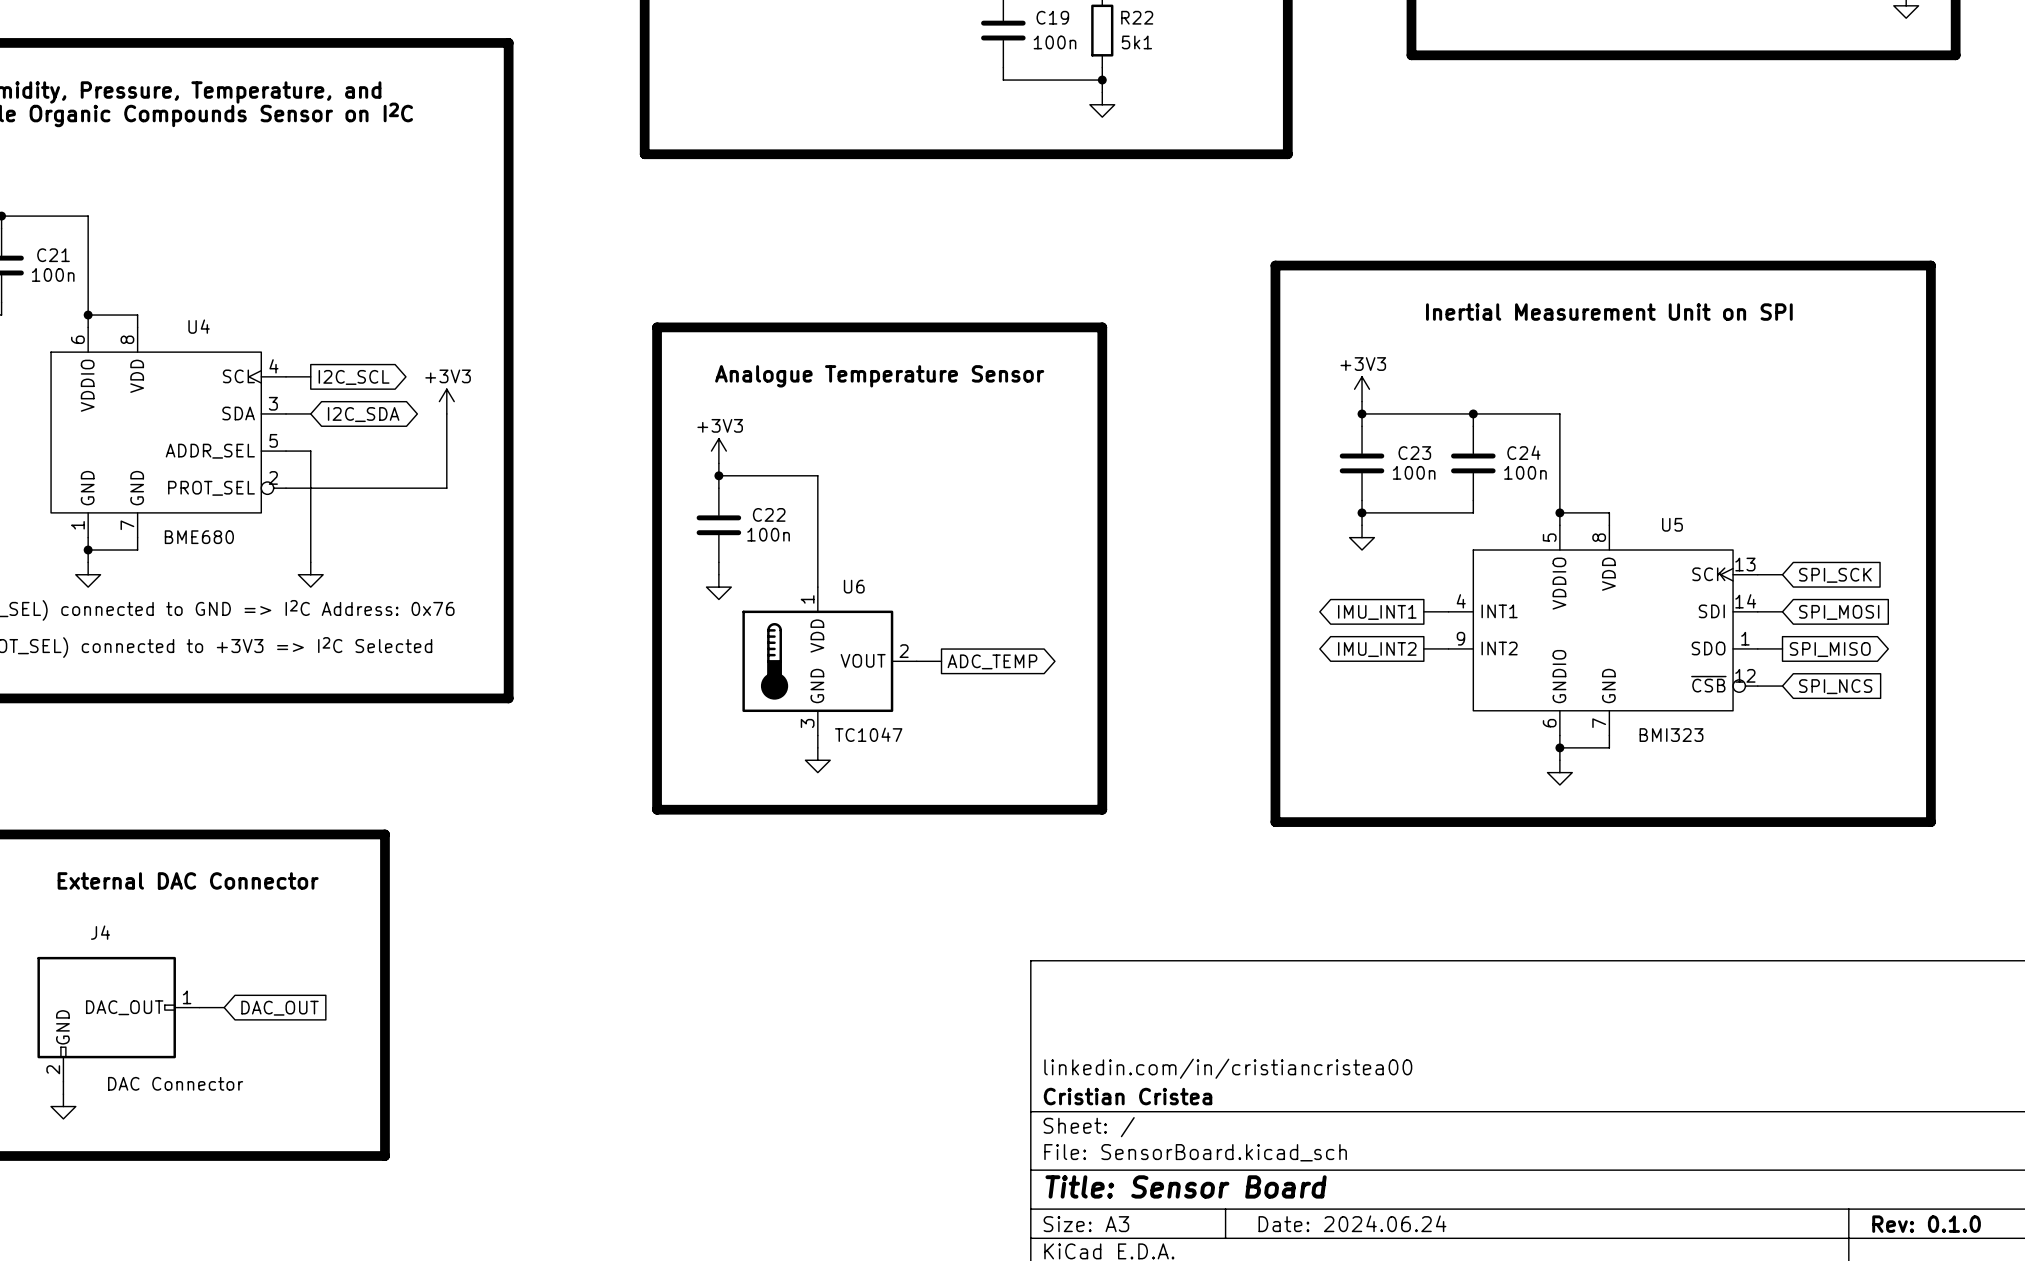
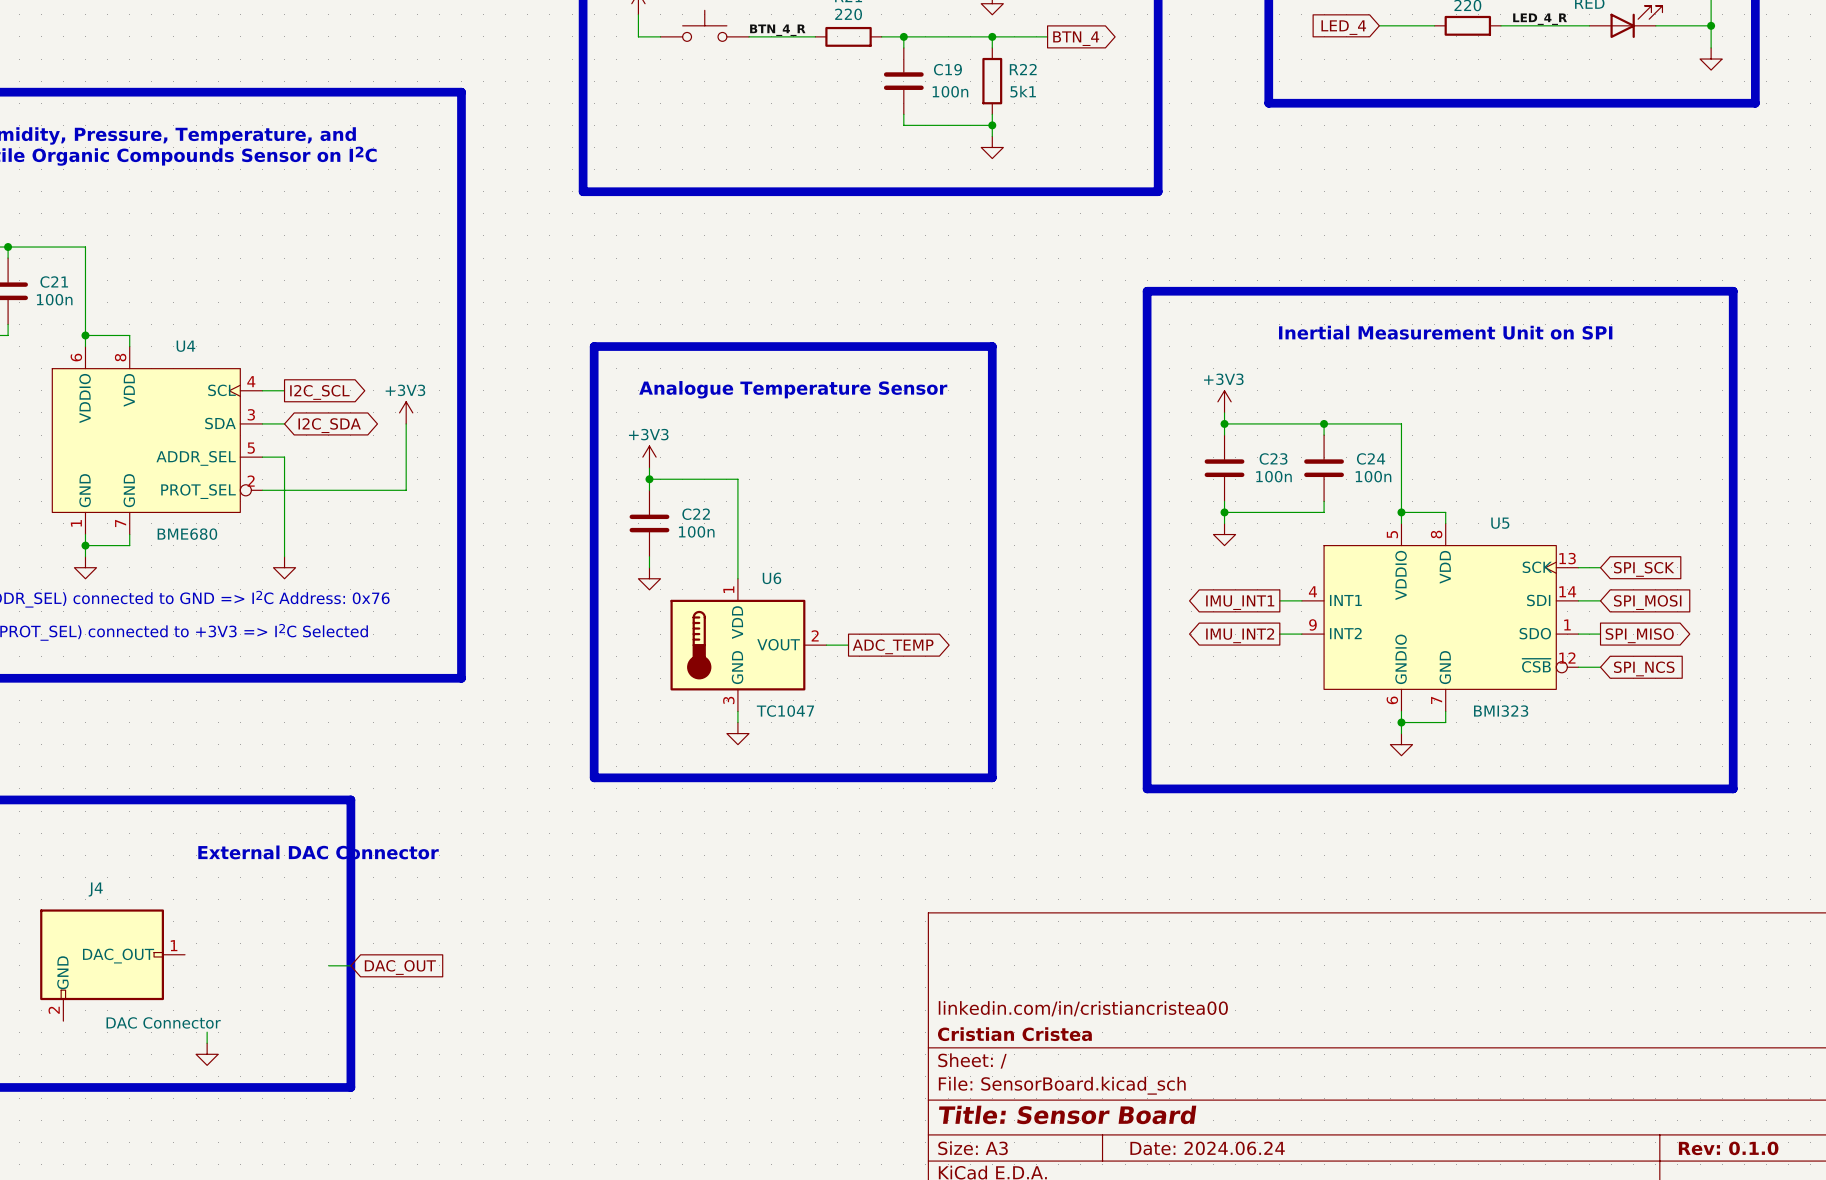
text position: External DAC Connector (188, 880) -> External DAC Connector (318, 852)
wire: (199, 1007) (224, 1007) -> (328, 965) (350, 965)
global label position: DAC_OUT (280, 1008) -> DAC_OUT (400, 967)
wire: (63, 1081) (63, 1094) -> (207, 1032) (207, 1043)
power symbol position: (63, 1106) -> (207, 1054)

